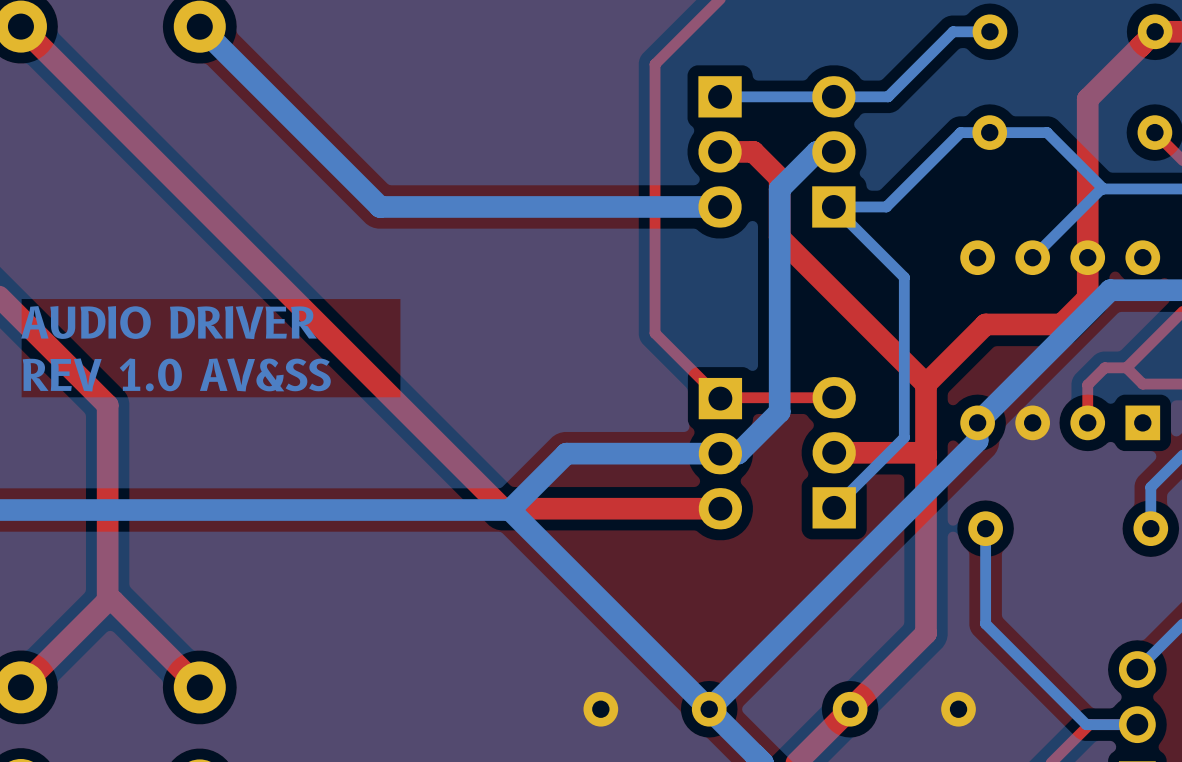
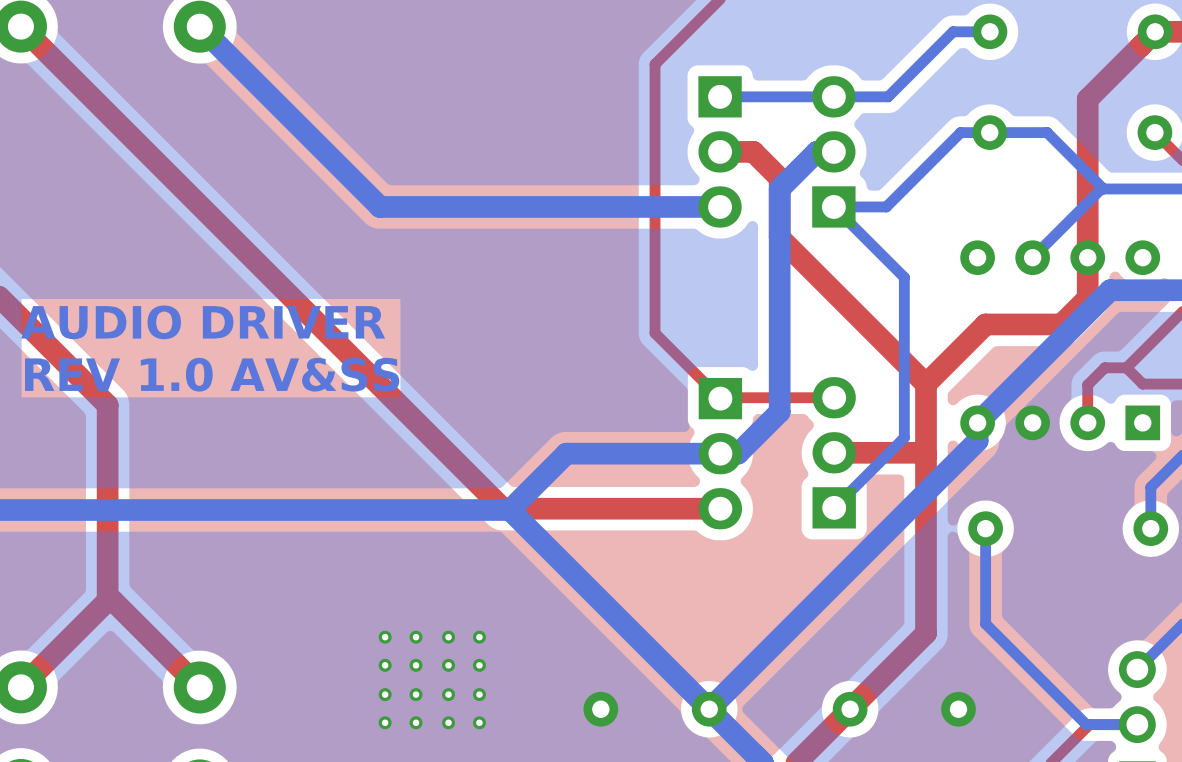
via: none -> (385, 637)
via: none -> (416, 637)
via: none -> (448, 637)
via: none -> (479, 637)
via: none -> (385, 665)
via: none -> (416, 665)
via: none -> (448, 665)
via: none -> (479, 665)
via: none -> (385, 694)
via: none -> (416, 694)
via: none -> (448, 694)
via: none -> (479, 694)
via: none -> (385, 722)
via: none -> (416, 722)
via: none -> (448, 722)
via: none -> (479, 722)

